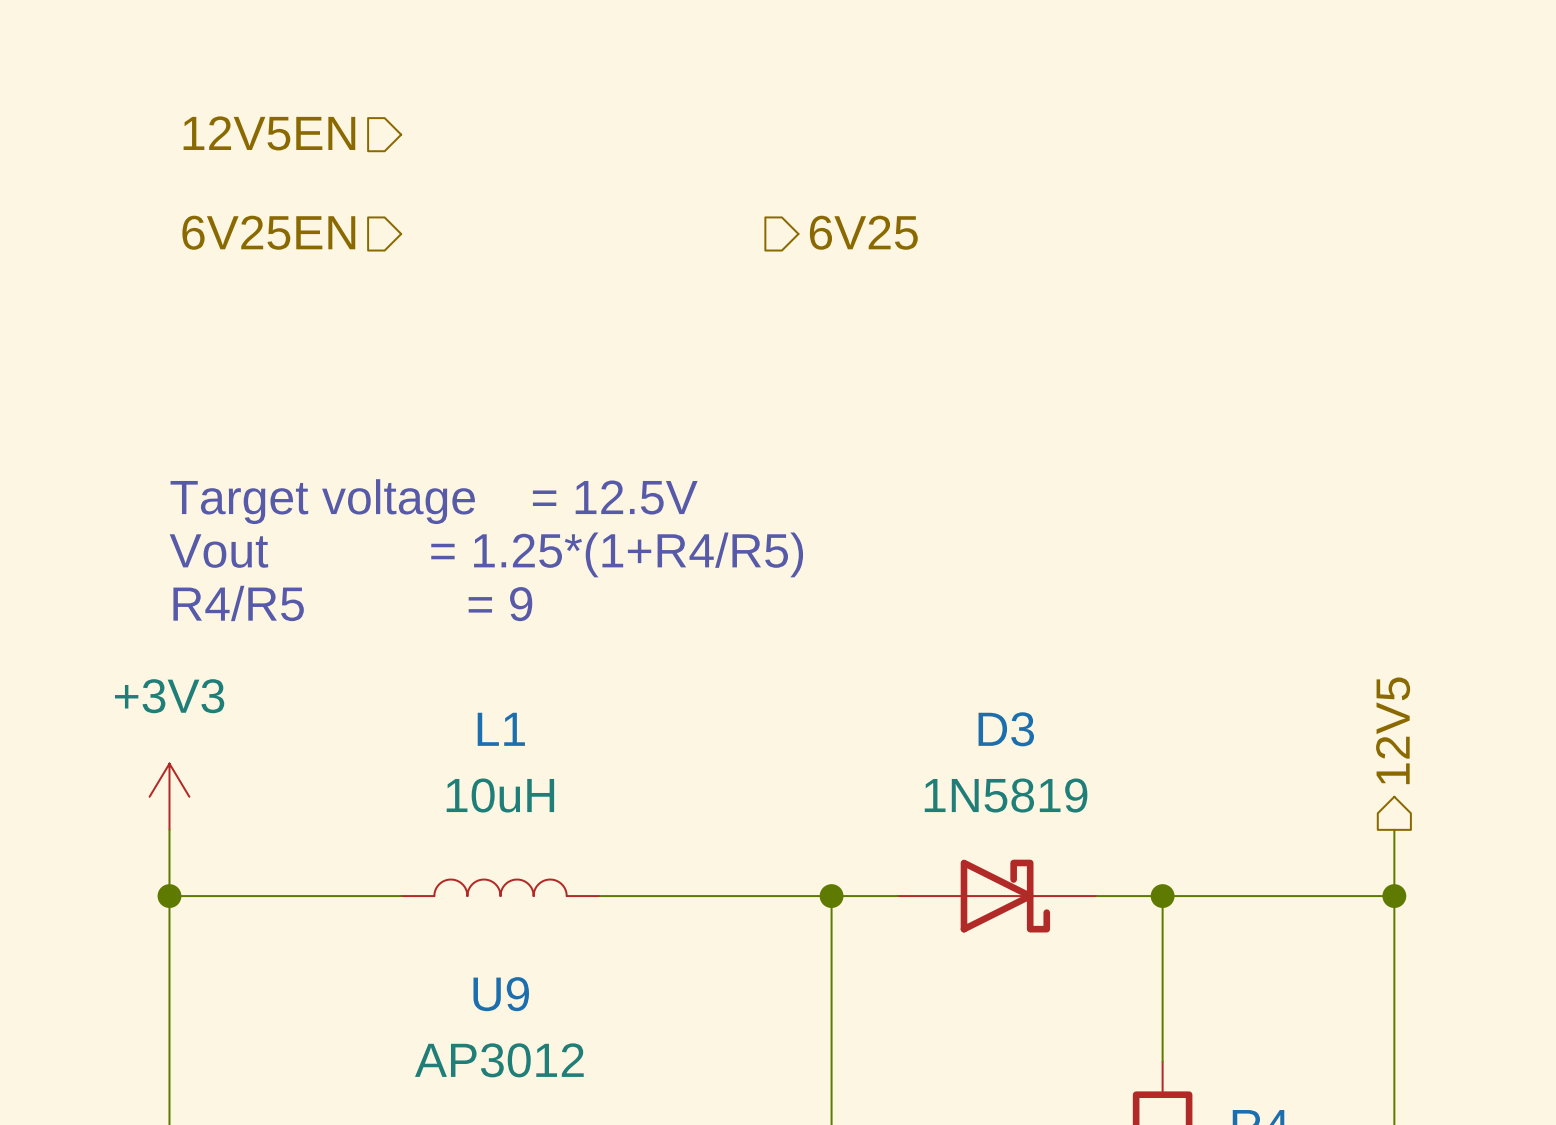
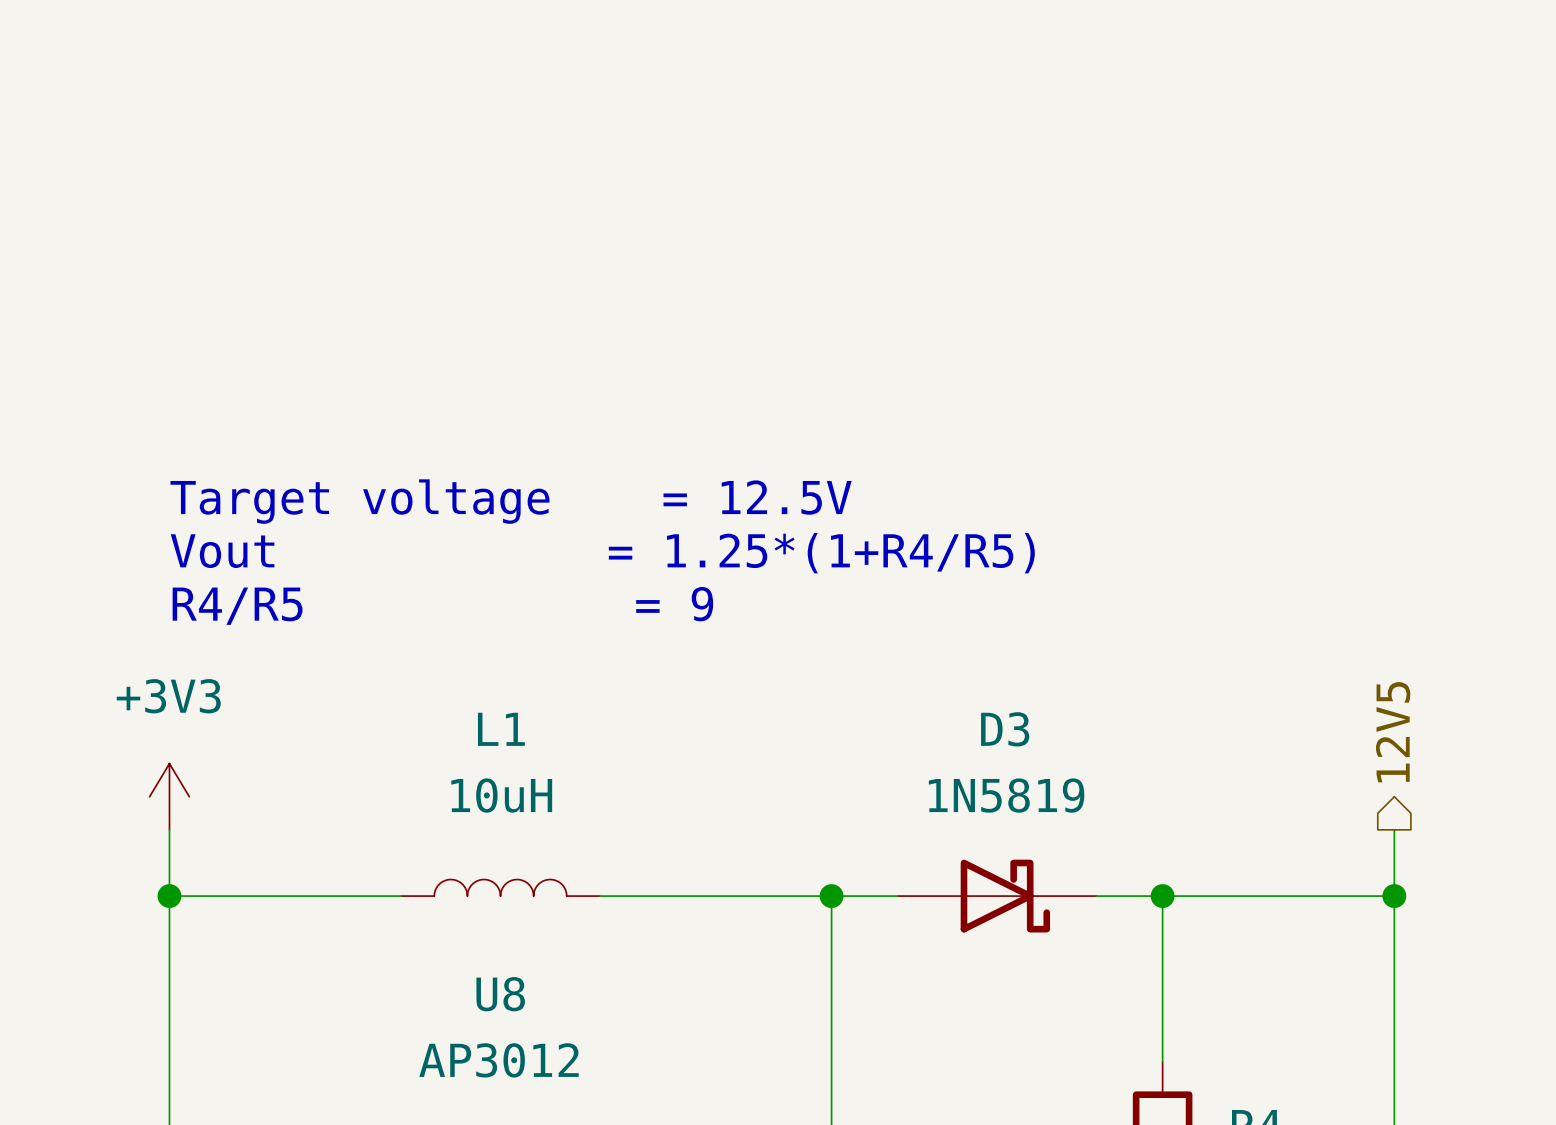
hierarchical label: 12V5EN (269, 133) -> none
hierarchical label: 6V25EN (268, 232) -> none
hierarchical label: 6V25 (863, 232) -> none
U9 name: U9 (501, 994) -> U8 (500, 994)

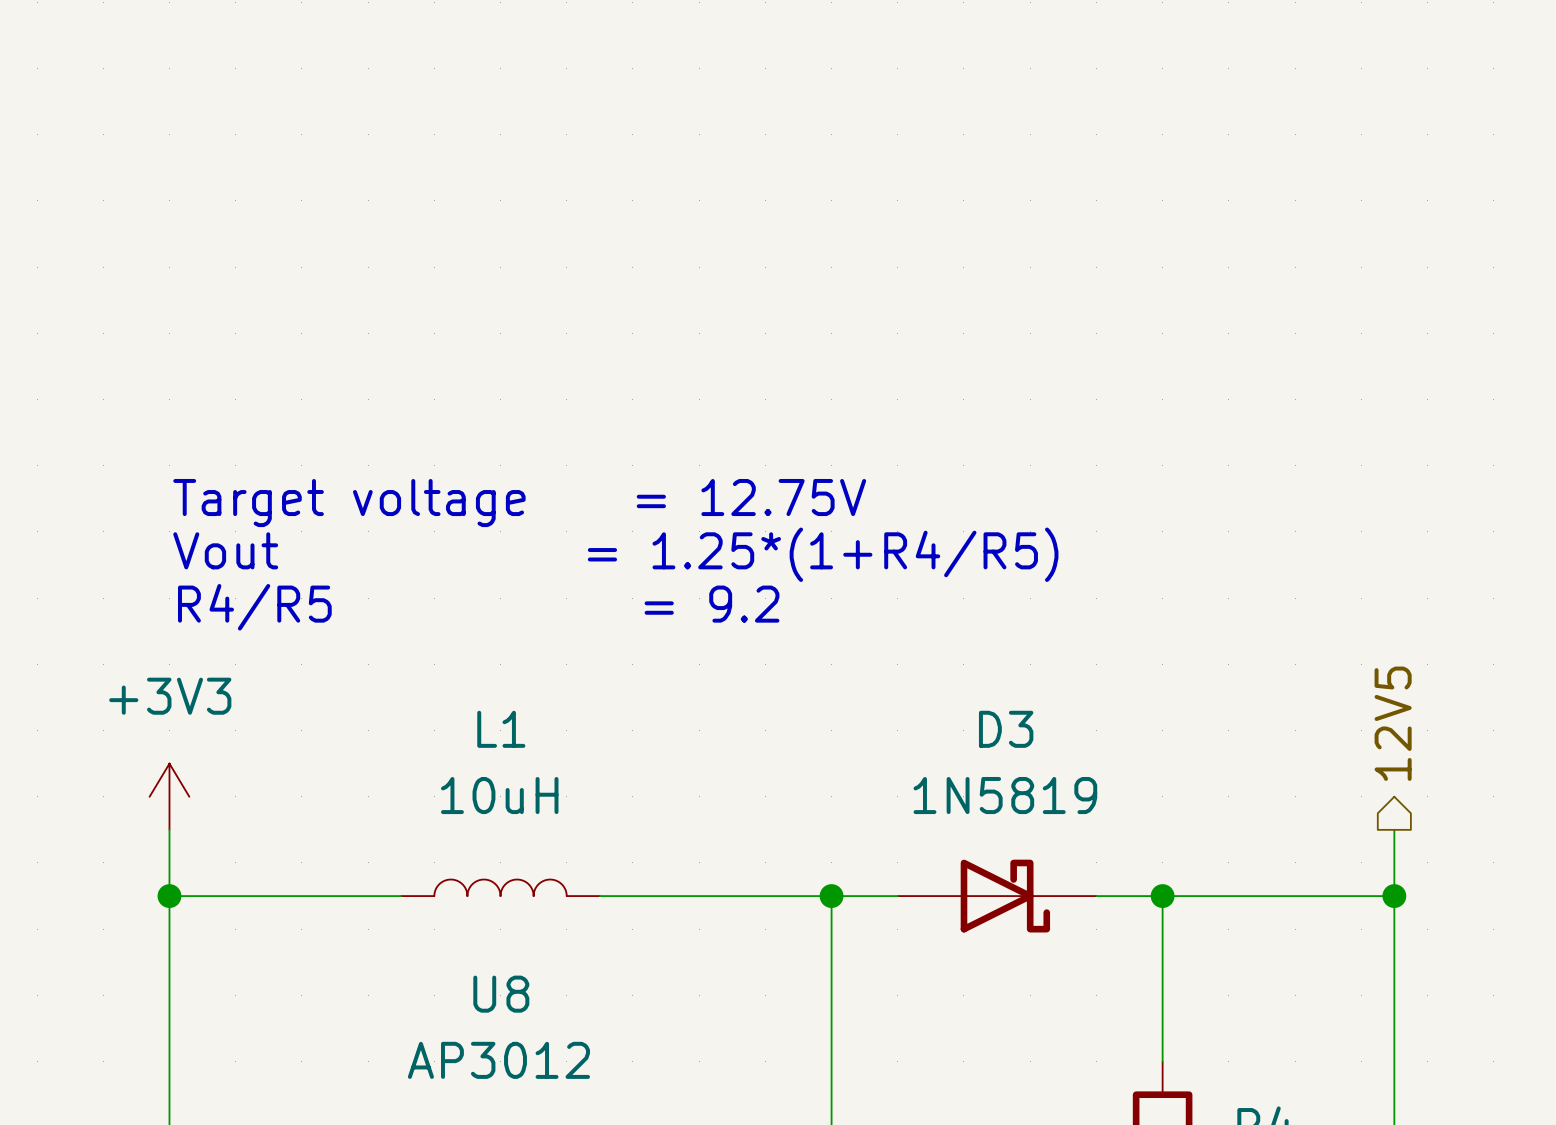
text: Target voltage = 12.5V (511, 501) -> Target voltage = 12.75V (519, 503)
text: R4/R5 = 9 (442, 605) -> R4/R5 = 9.2 (478, 607)

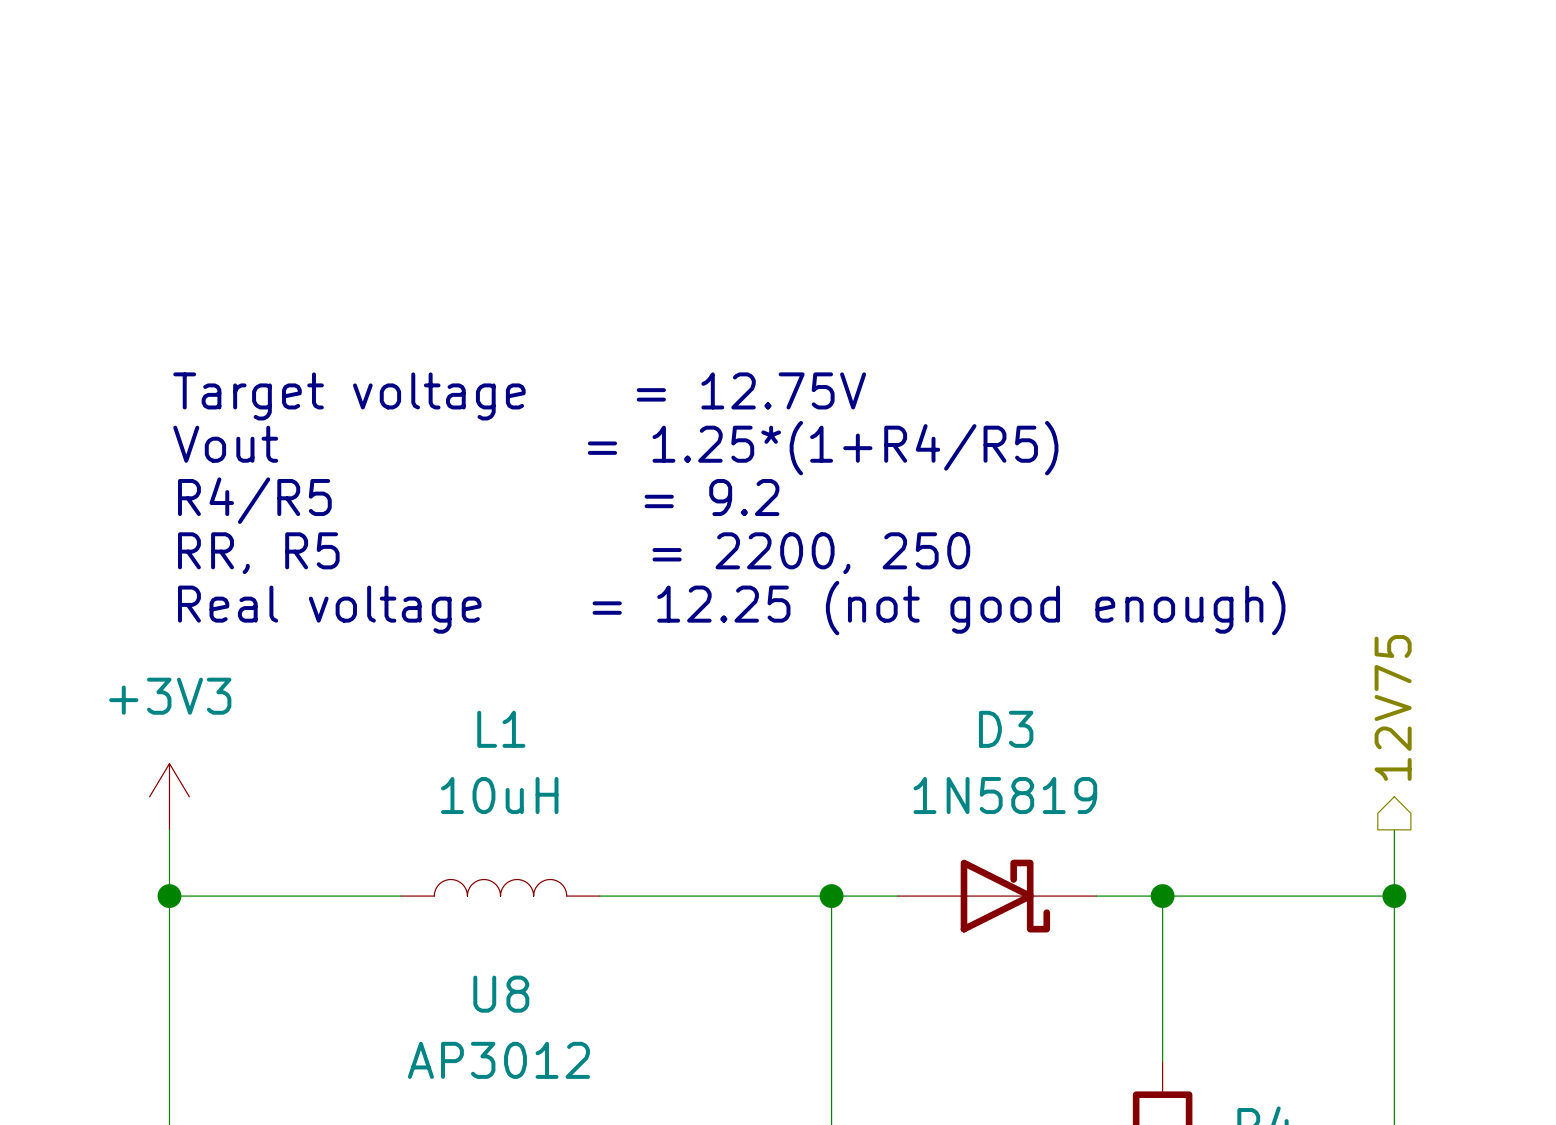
text: none -> Target voltage = 12.75V (519, 396)
text: none -> Vout = 1.25*(1+R4/R5) (615, 448)
text: Target voltage = 12.75V (519, 503) -> R4/R5 = 9.2 (478, 500)
text: Vout = 1.25*(1+R4/R5) (615, 554) -> RR, R5 = 2200, 250 (574, 553)
text: R4/R5 = 9.2 (478, 607) -> Real voltage = 12.25 (not good enough) (731, 608)
hierarchical label: 12V5 (1393, 723) -> 12V75 (1393, 707)

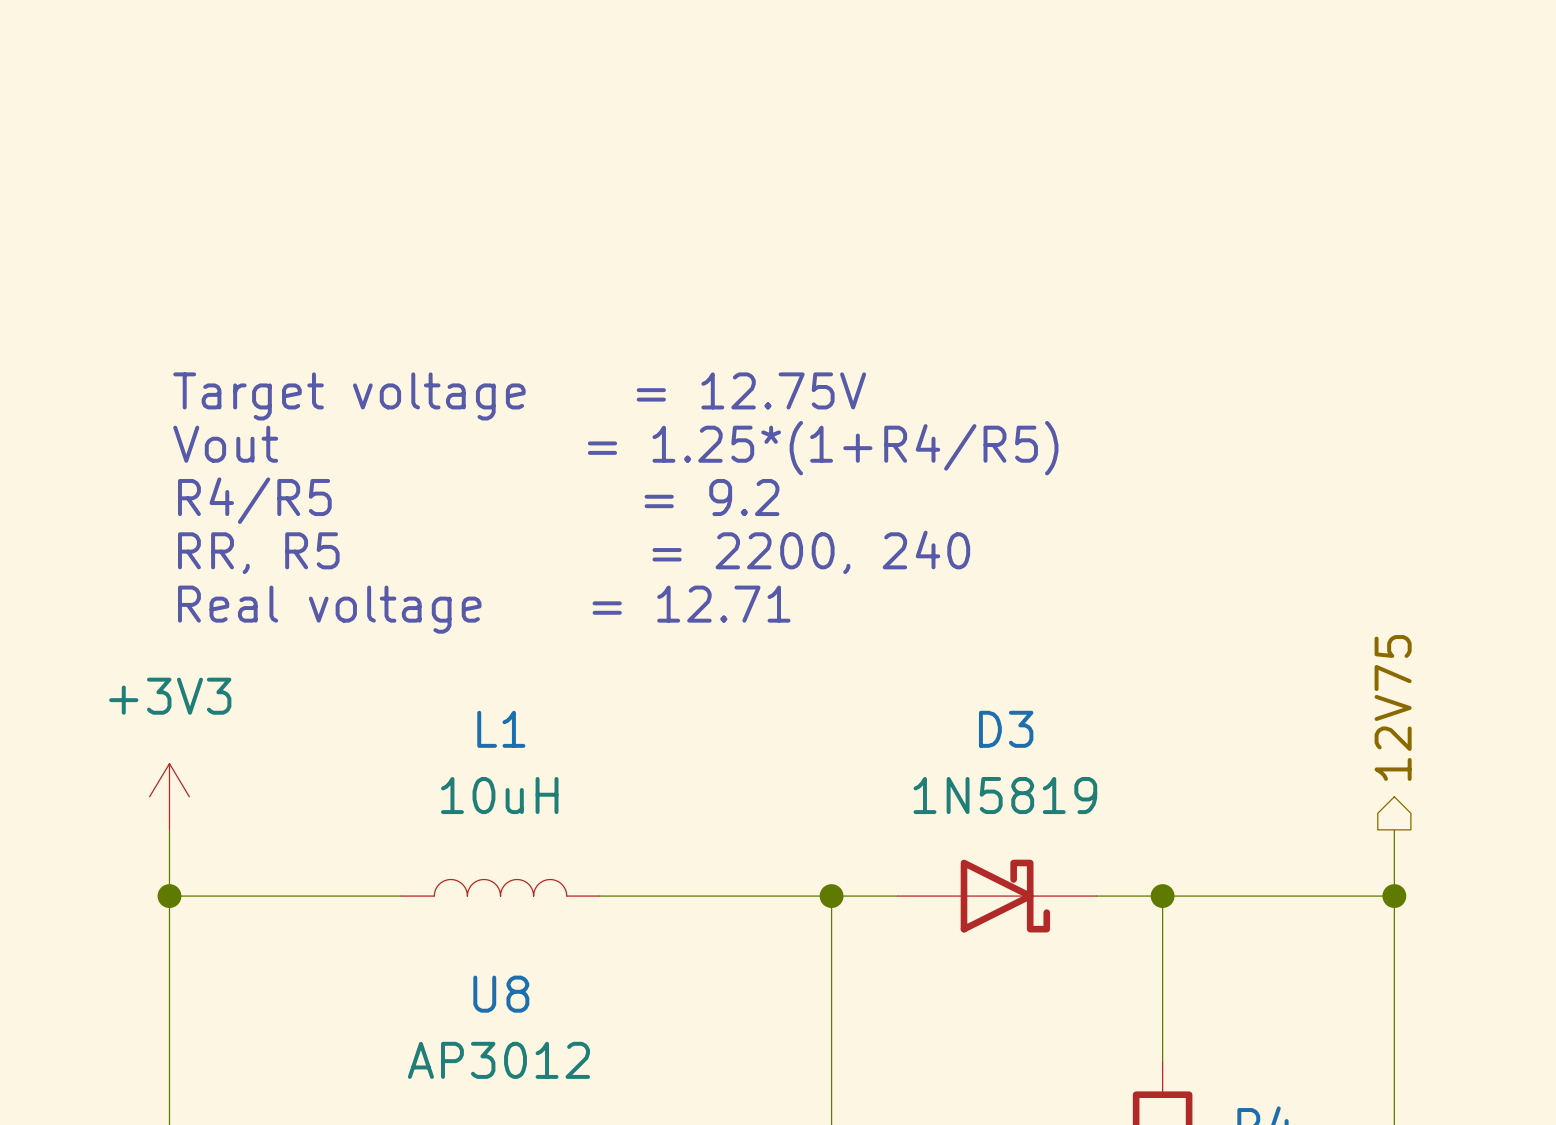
text: RR, R5 = 2200, 250 (574, 553) -> RR, R5 = 2200, 240 (574, 552)
text: Real voltage = 12.25 (not good enough) (731, 608) -> Real voltage = 12.71 (484, 609)

